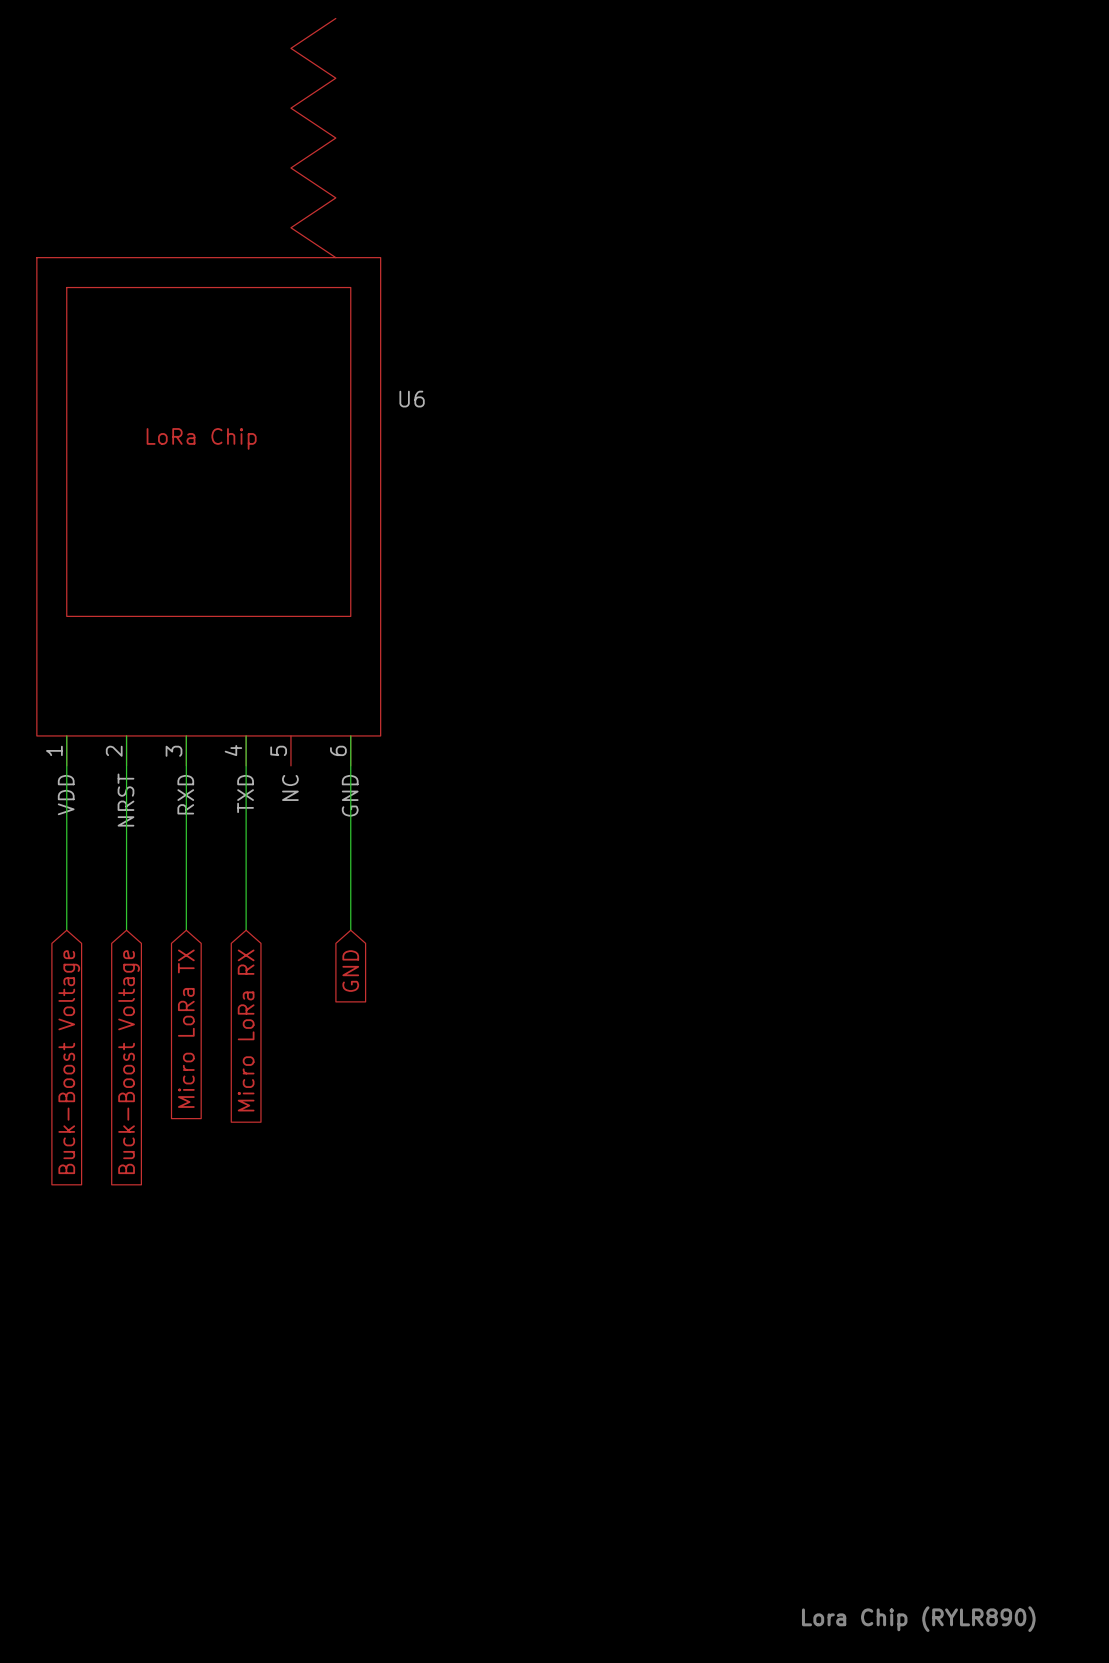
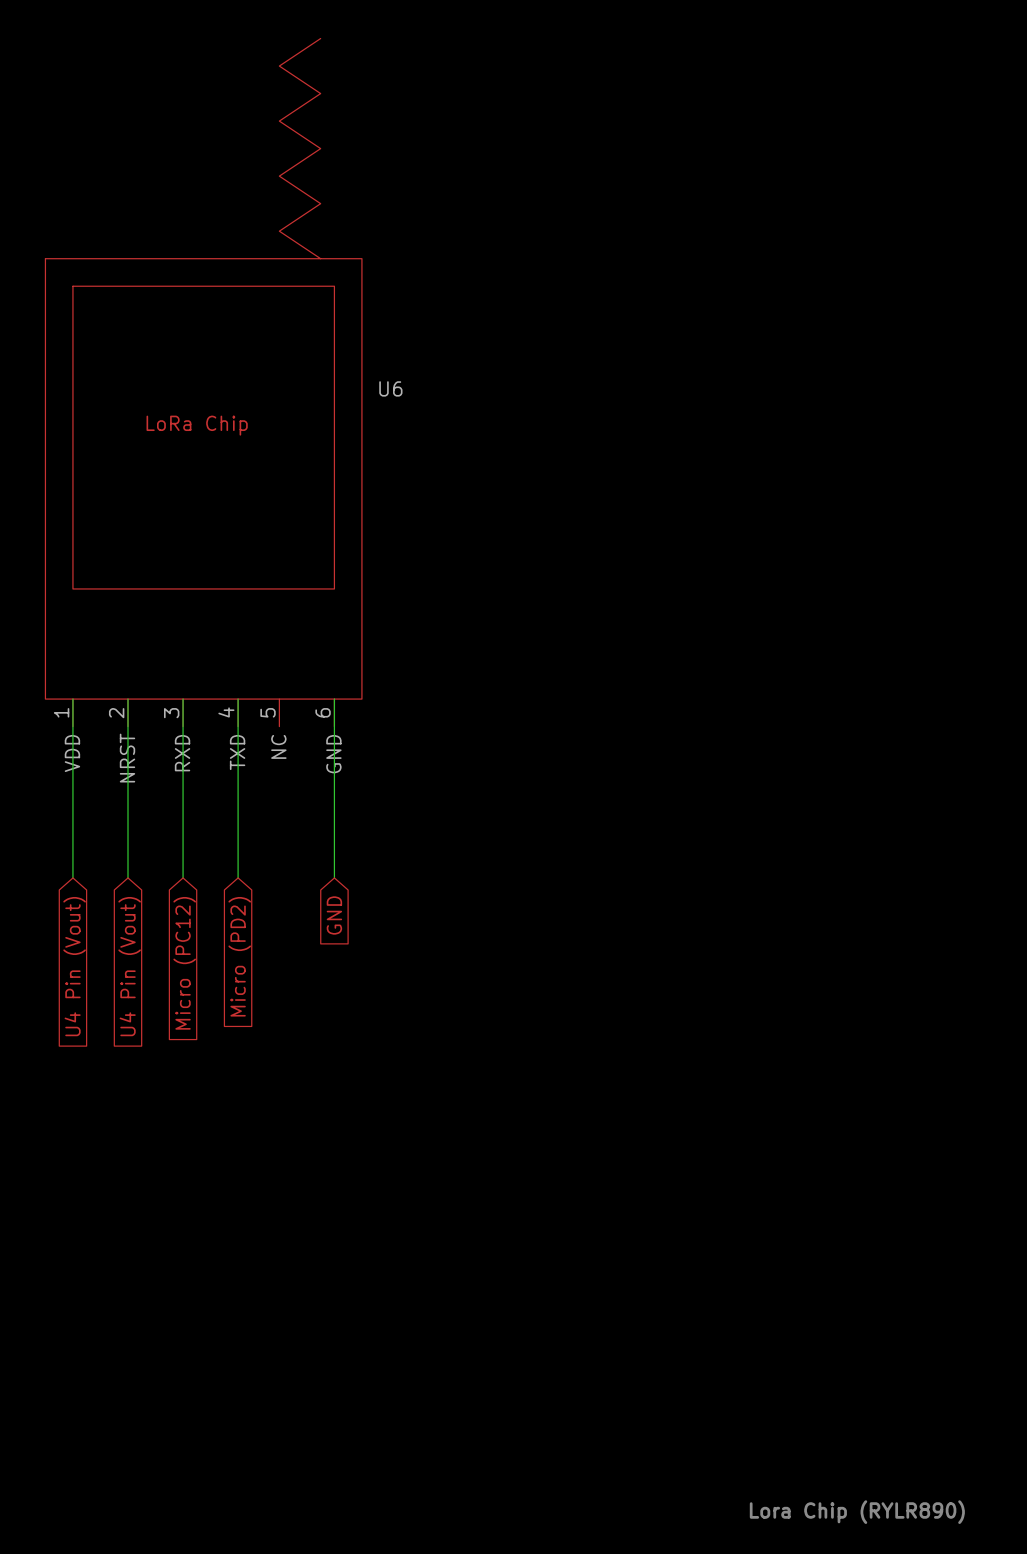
global label: Micro LoRa TX (186, 1028) -> Micro (PC12) (184, 963)
global label: Micro LoRa RX (246, 1030) -> Micro (PD2) (239, 956)
global label: Buck-Boost Voltage (69, 1062) -> U4 Pin (Vout) (74, 966)
global label: Buck-Boost Voltage (129, 1062) -> U4 Pin (Vout) (129, 966)

